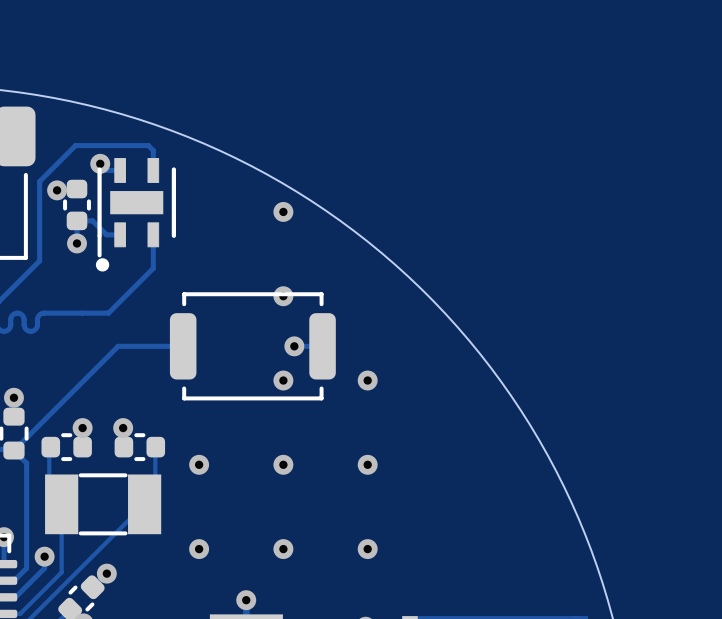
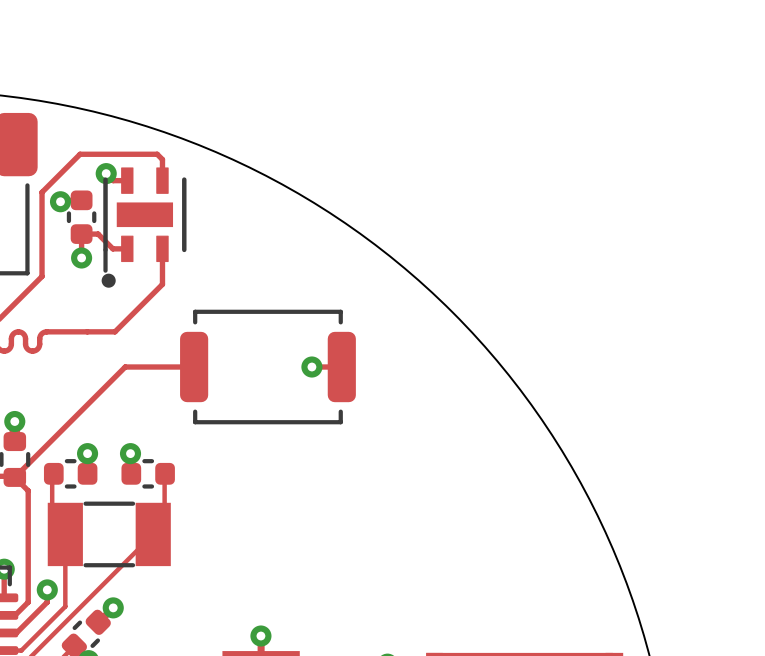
via: (283, 211) -> none
via: (283, 296) -> none
via: (283, 380) -> none
via: (367, 380) -> none
via: (199, 464) -> none
via: (283, 464) -> none
via: (367, 464) -> none
via: (199, 549) -> none
via: (283, 549) -> none
via: (367, 549) -> none

